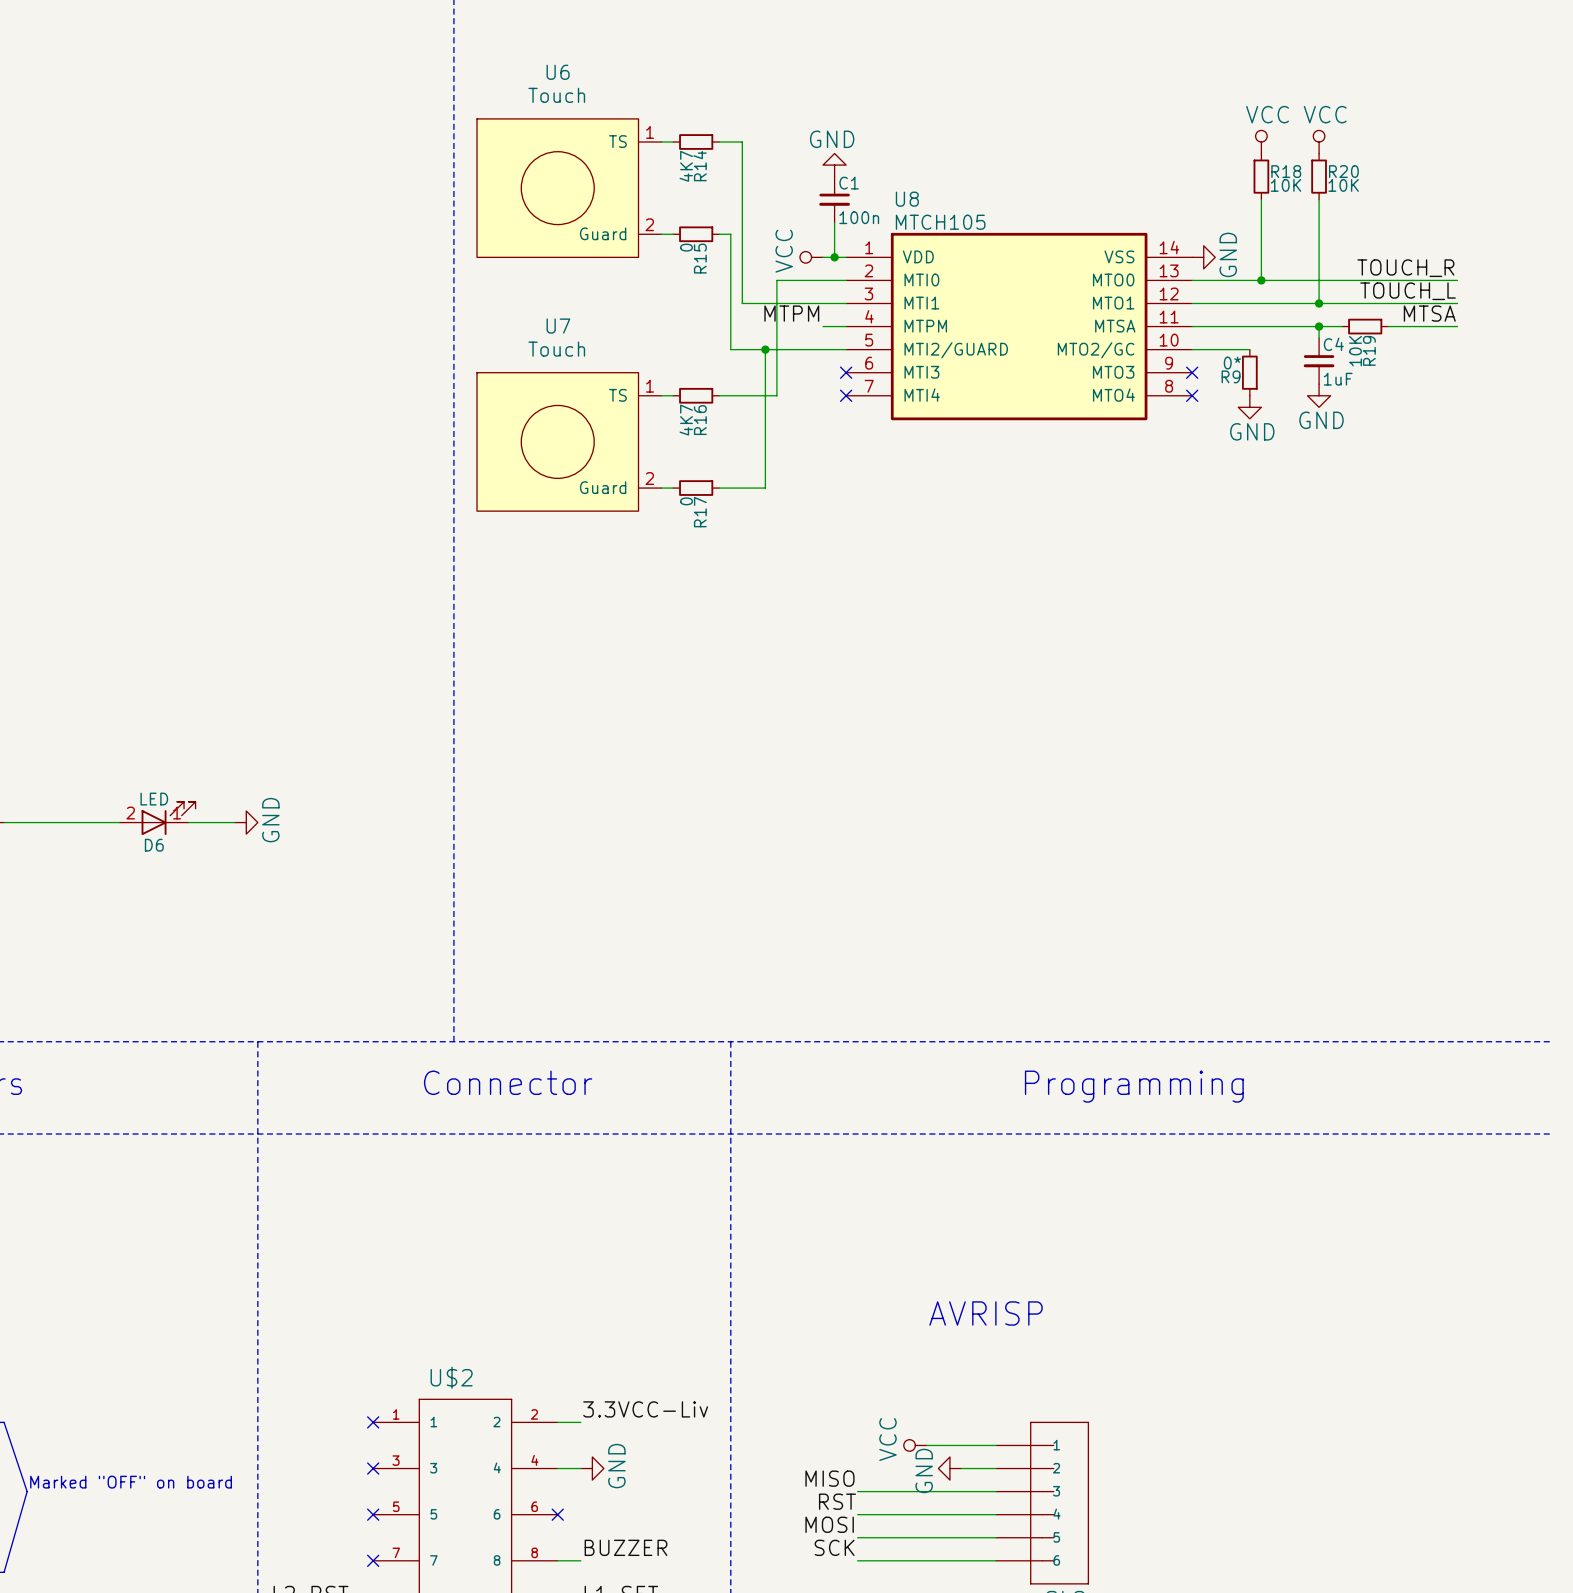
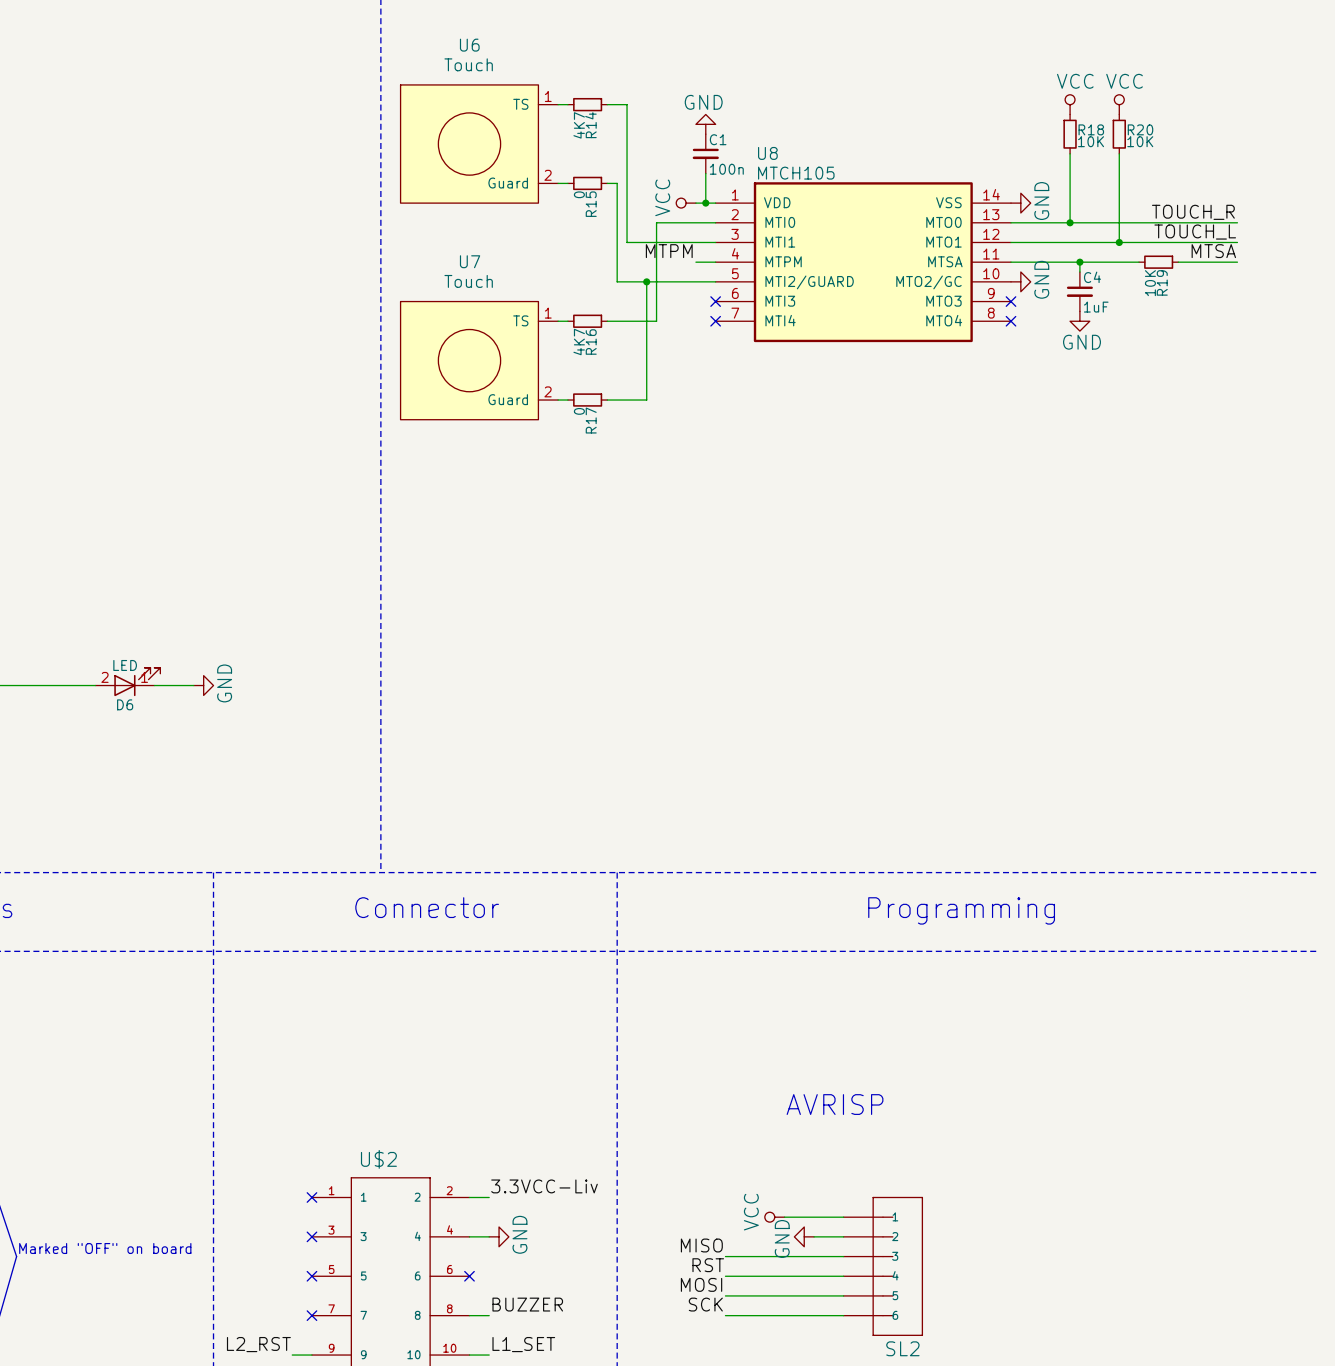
wire: (1319, 326) (1319, 338) -> (1079, 262) (1079, 272)
junction position: (1319, 326) -> (1079, 262)
wire: (1192, 349) (1249, 349) -> none
power symbol: none -> GND (1020, 281)
C4 position: (1319, 361) -> (1079, 291)
R9: 0* (1249, 372) -> none
power symbol: none -> GND (1079, 321)
power symbol: GND (1319, 395) -> none
power symbol: GND (1249, 407) -> none

